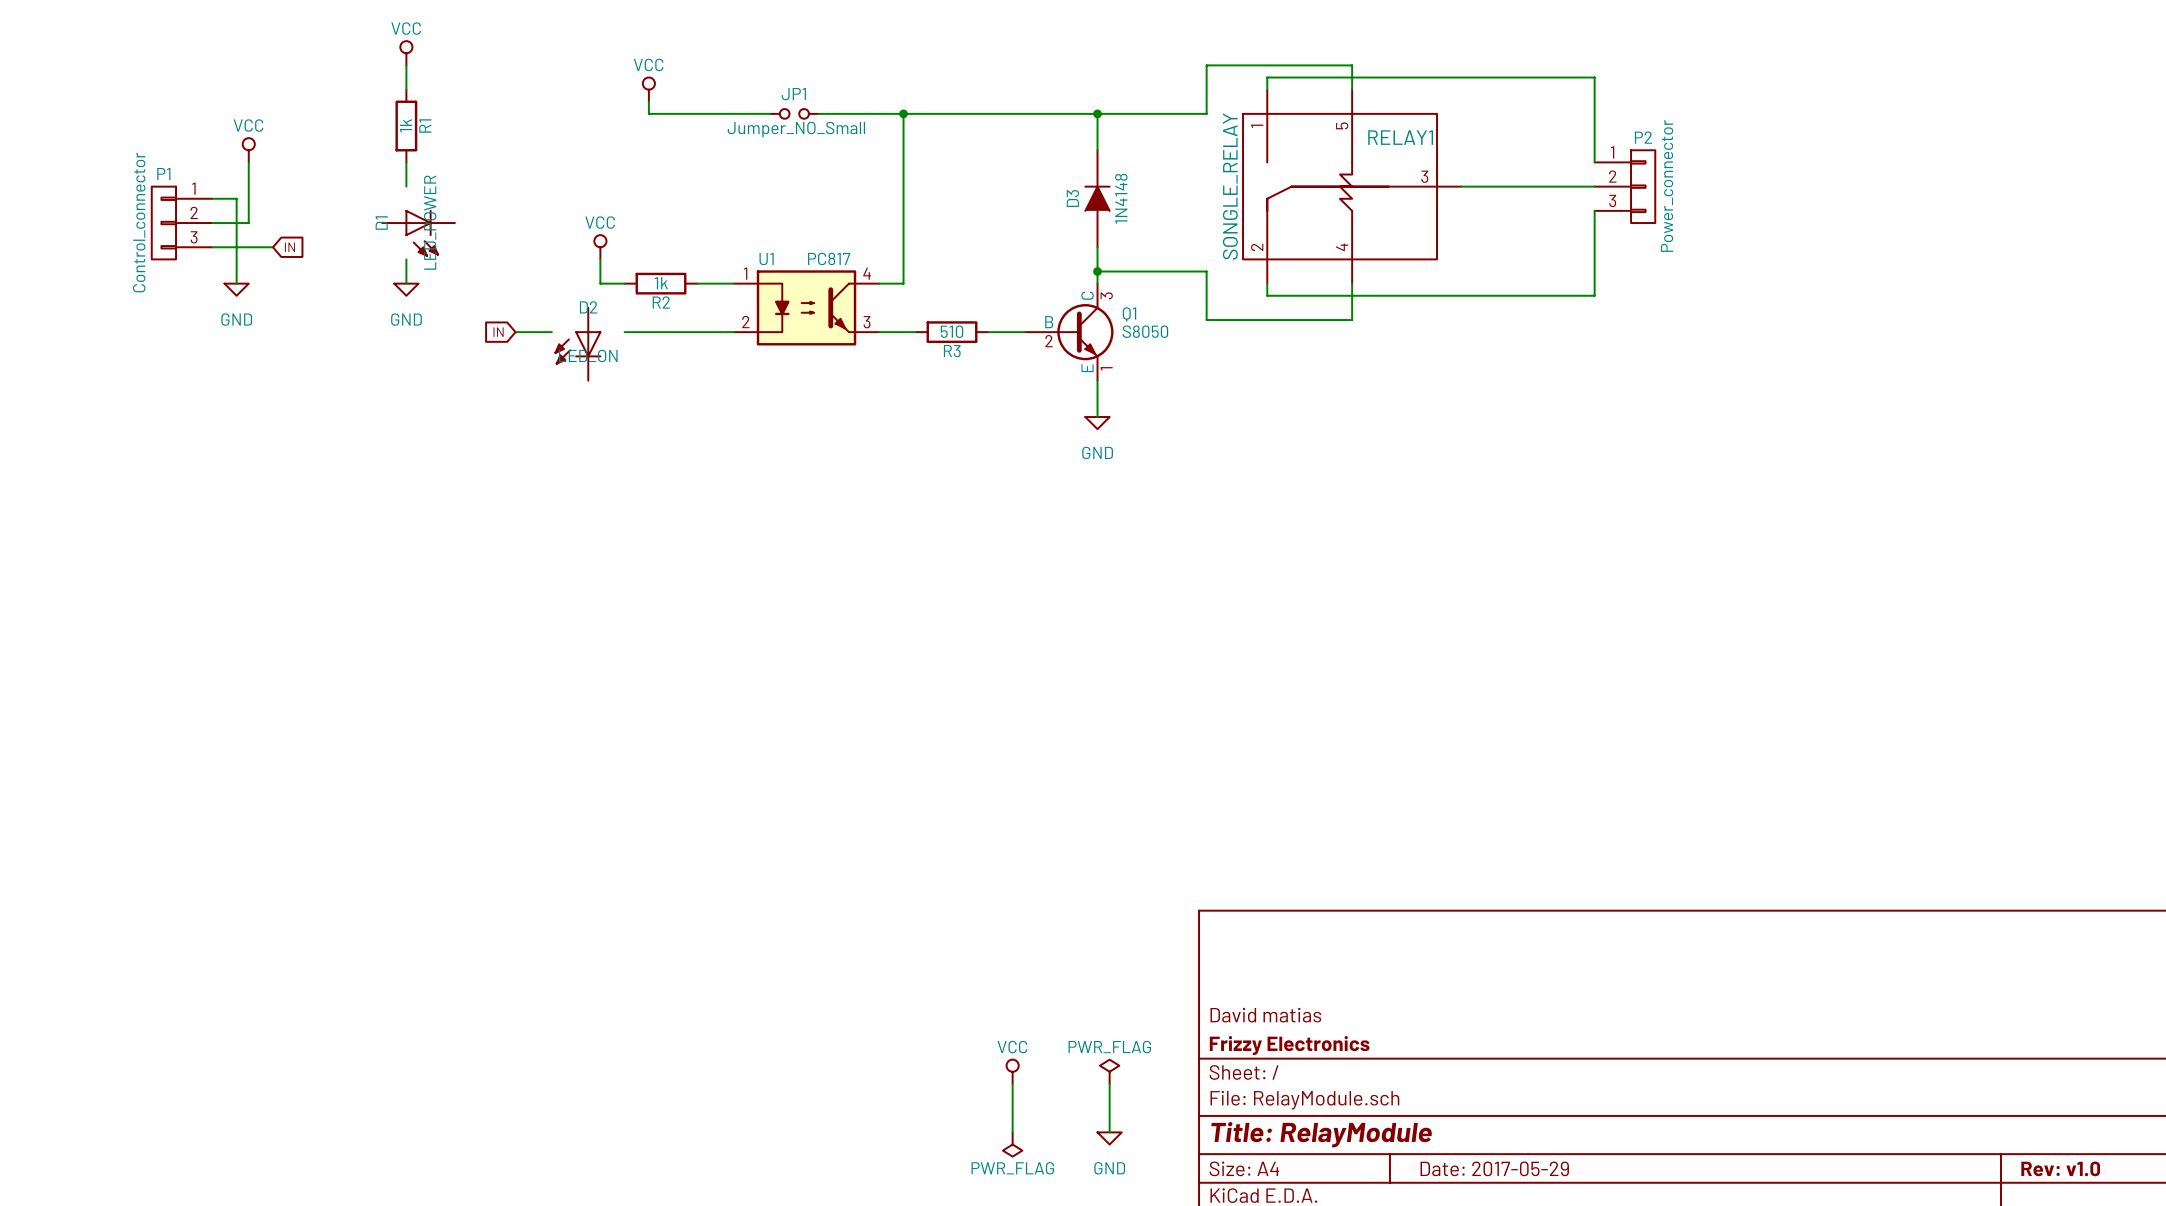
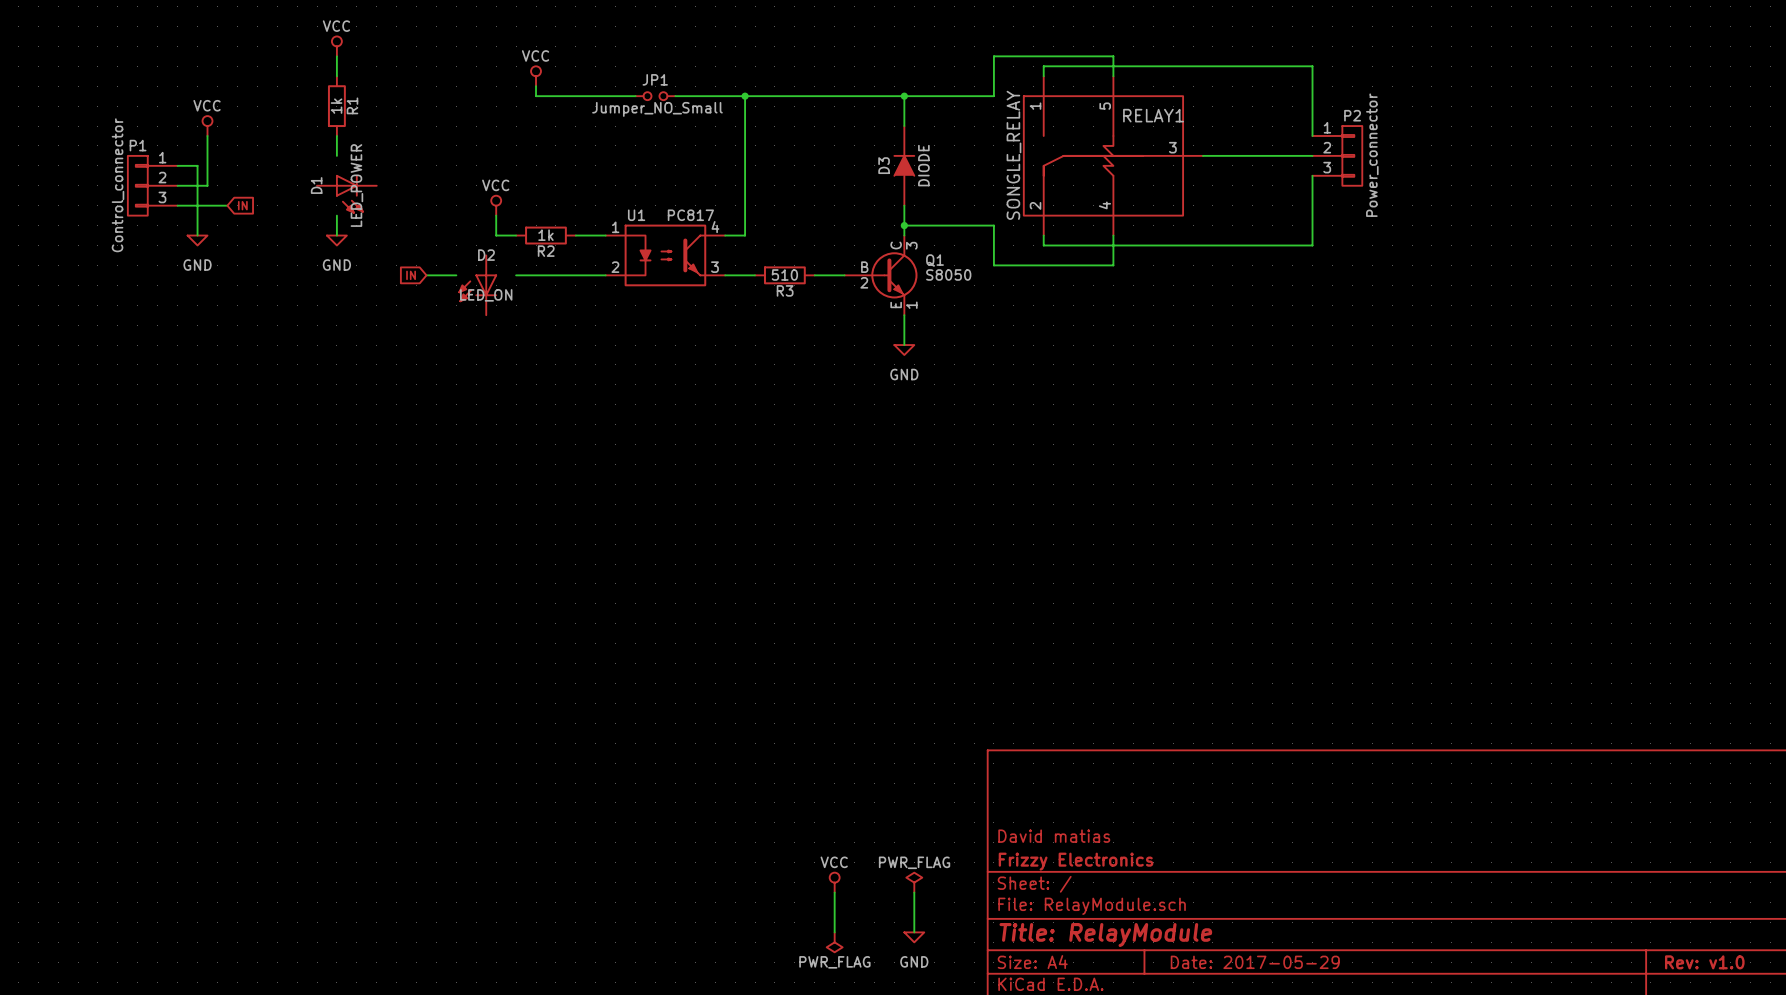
D3 value: 1N4148 (1121, 198) -> DIODE (923, 165)

